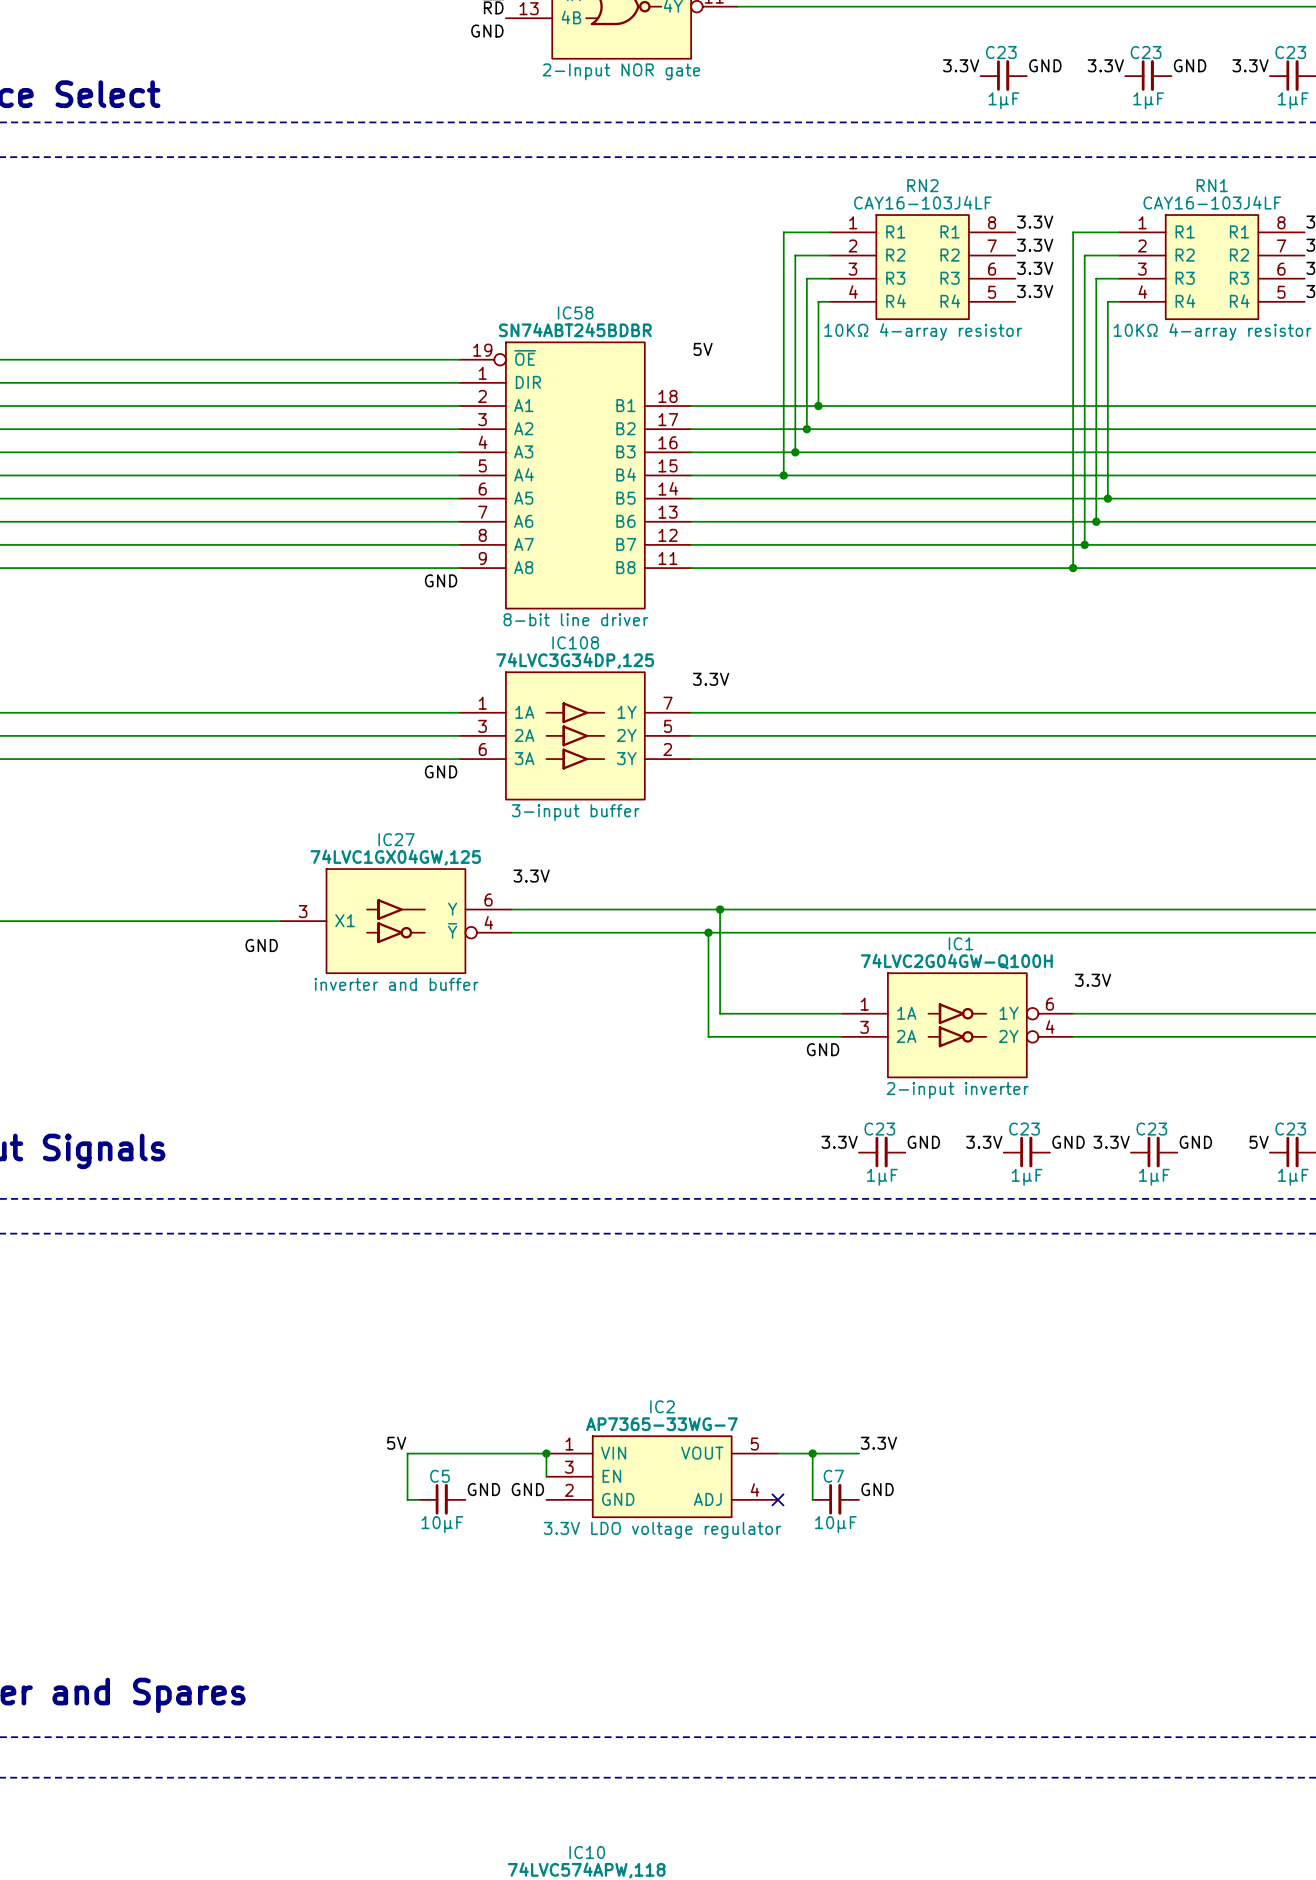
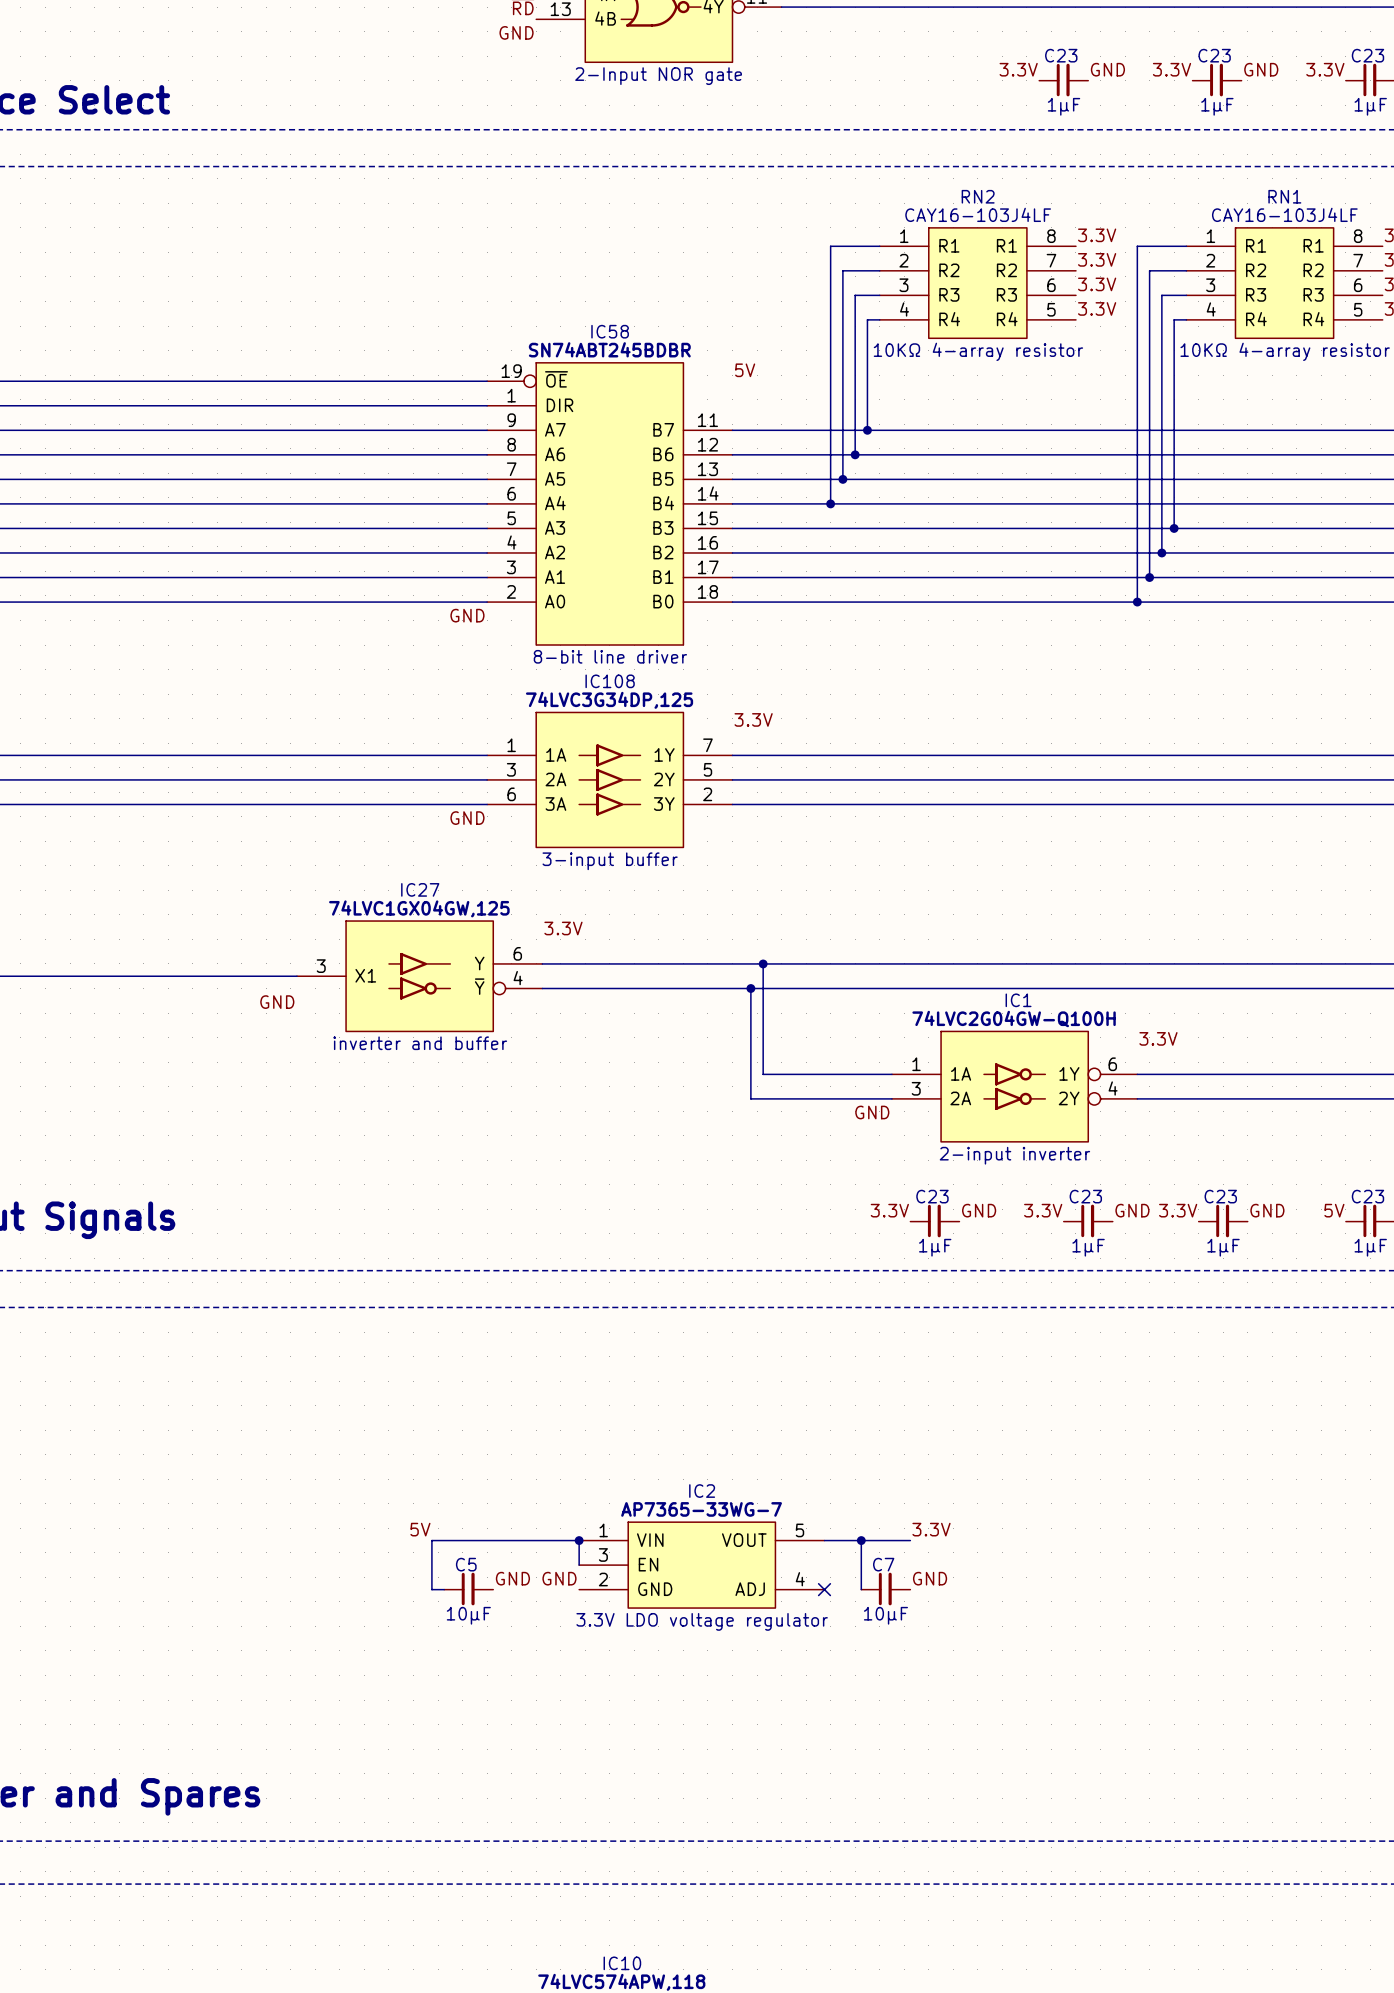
IC58 symbol: [459, 341, 692, 610] -> [487, 362, 733, 646]

